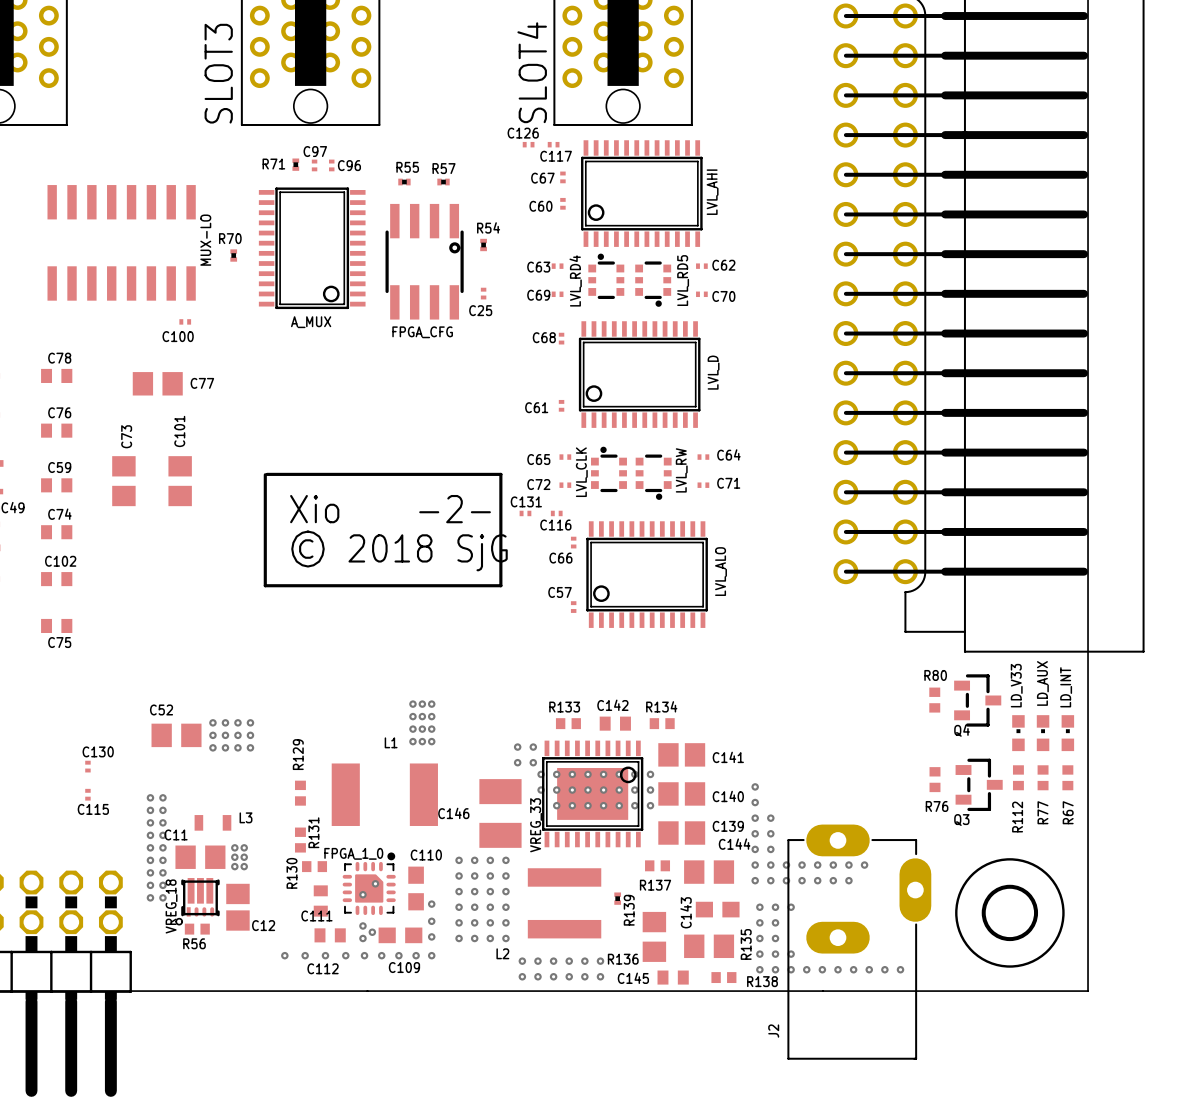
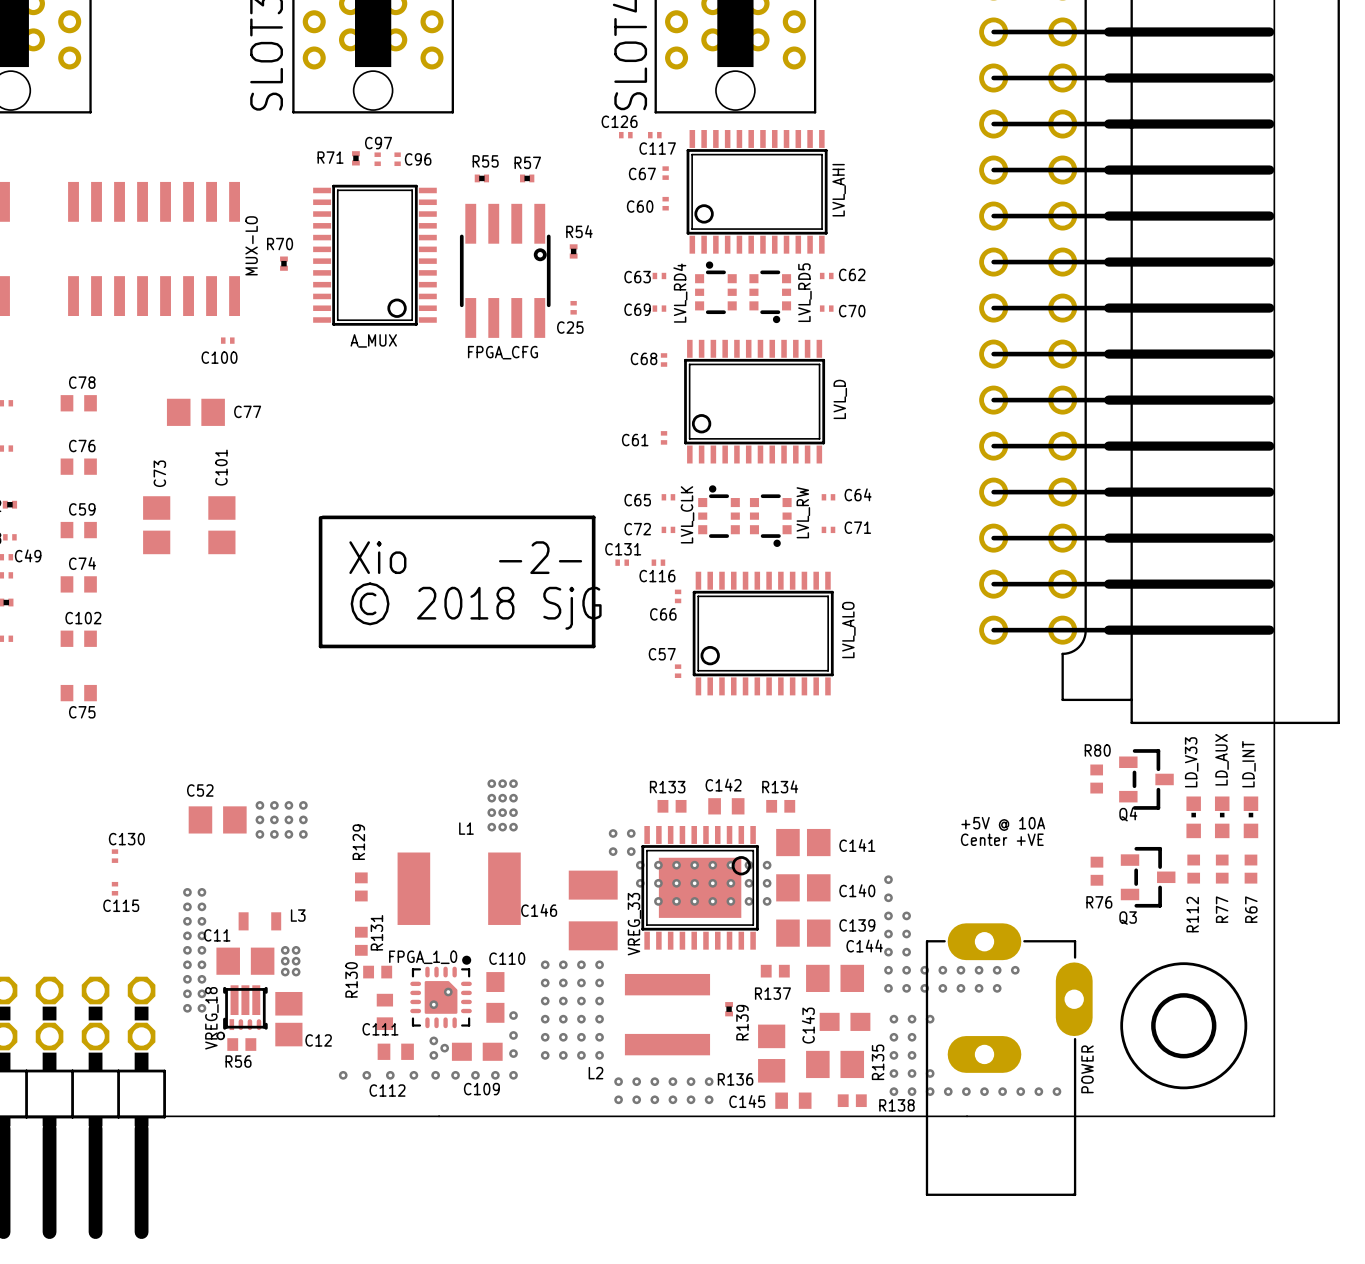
text: none -> +5V @ 10A (1003, 823)
text: none -> Center +VE (1002, 839)
J2 name: J2 (773, 1031) -> POWER (1087, 1069)

